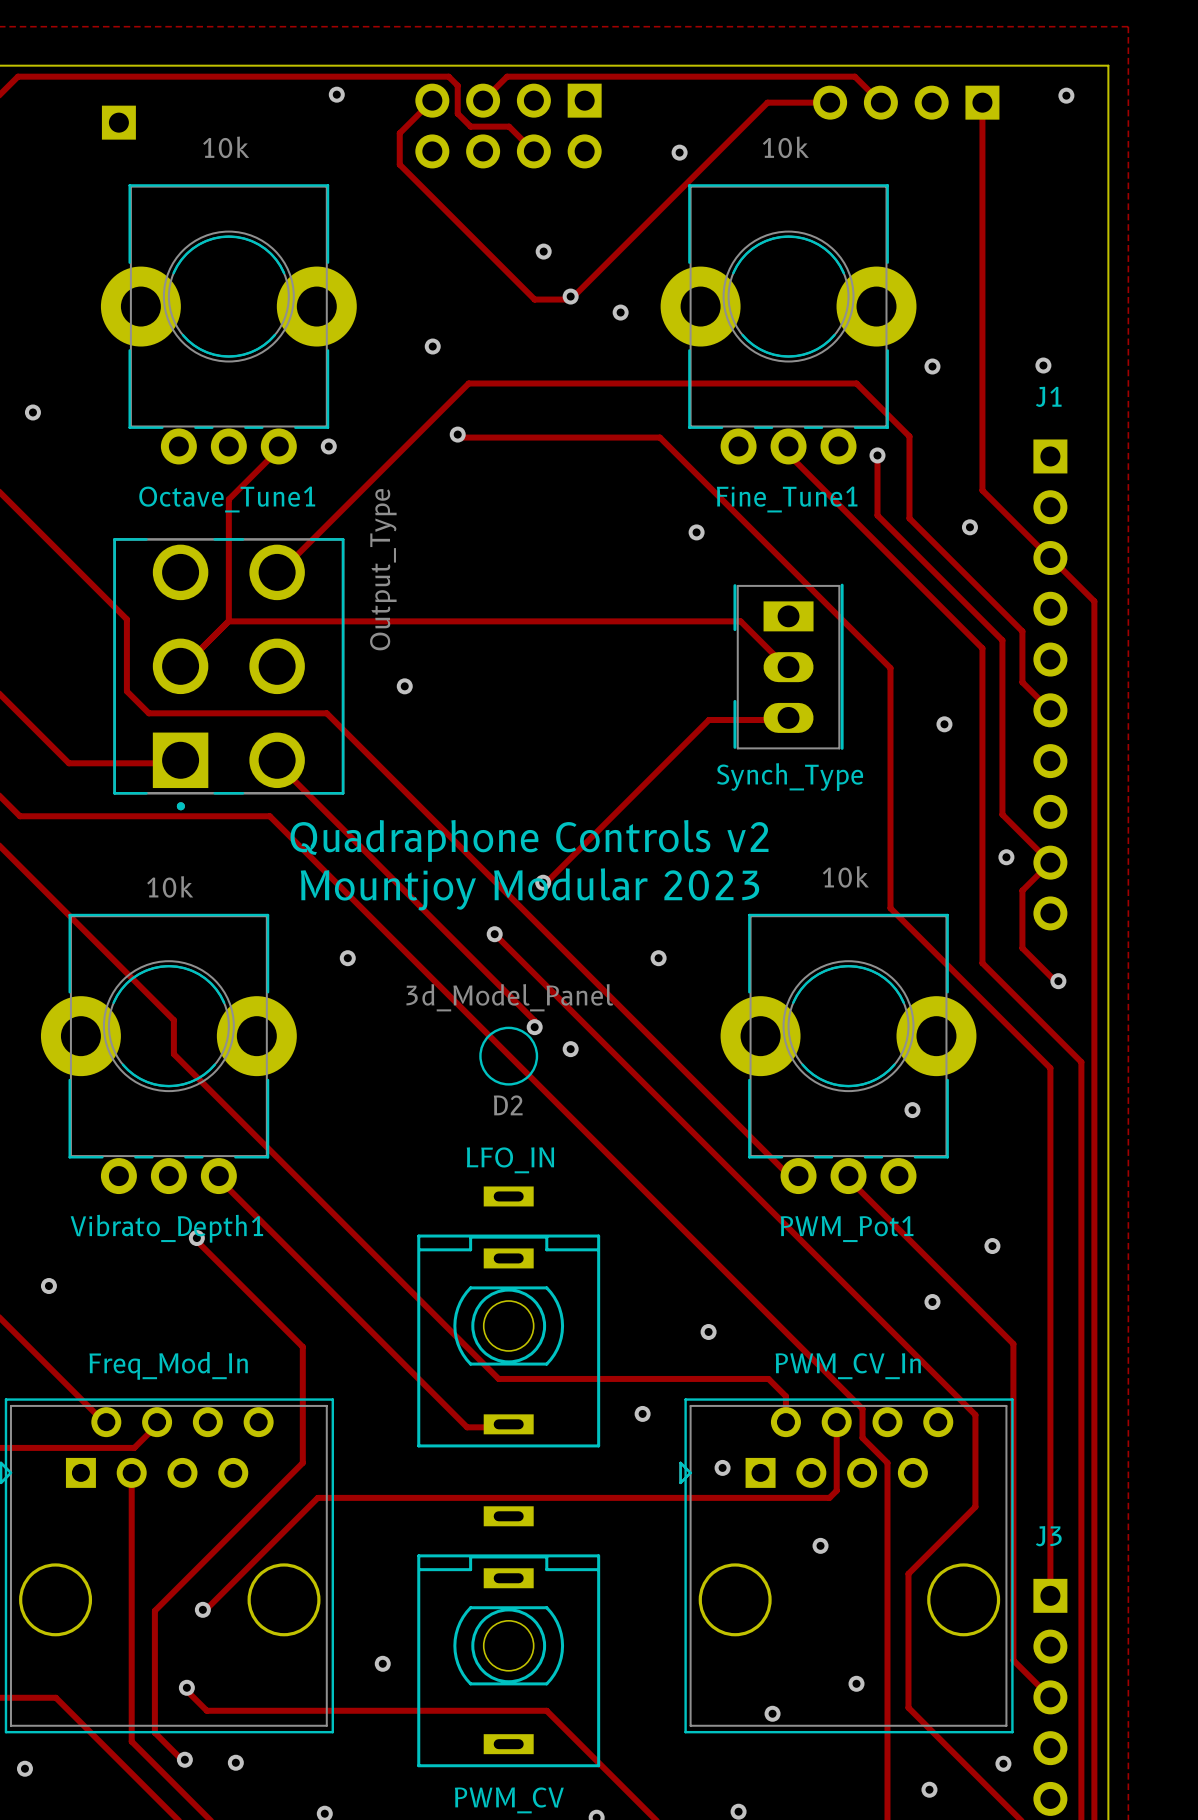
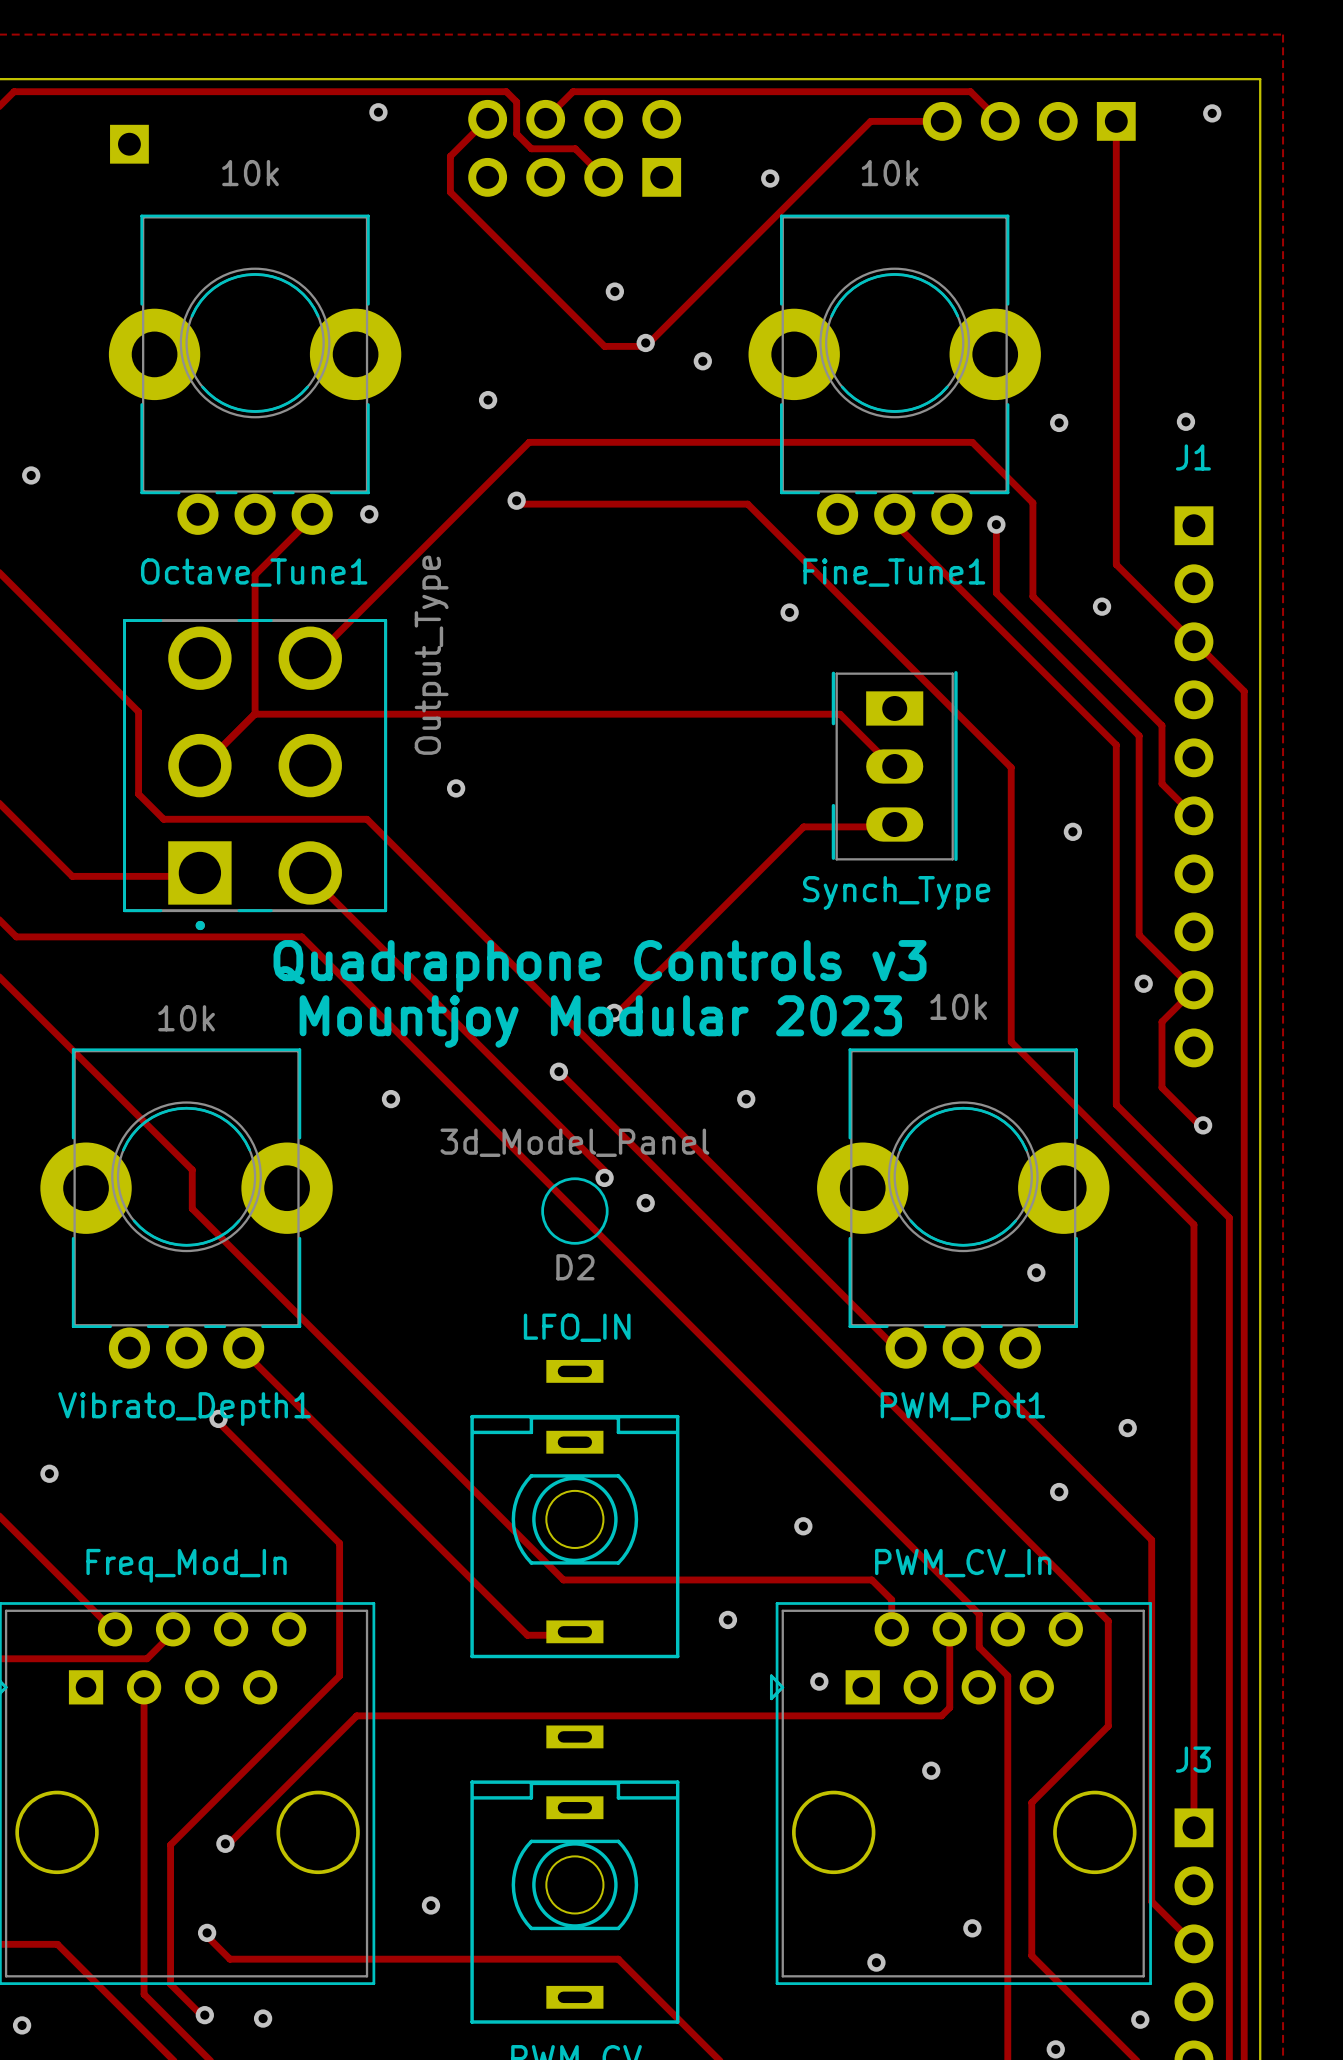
part footprint: [415, 83, 602, 169] -> [468, 99, 682, 197]
text: Quadraphone Controls v2 (529, 840) -> Quadraphone Controls v3 (600, 966)

